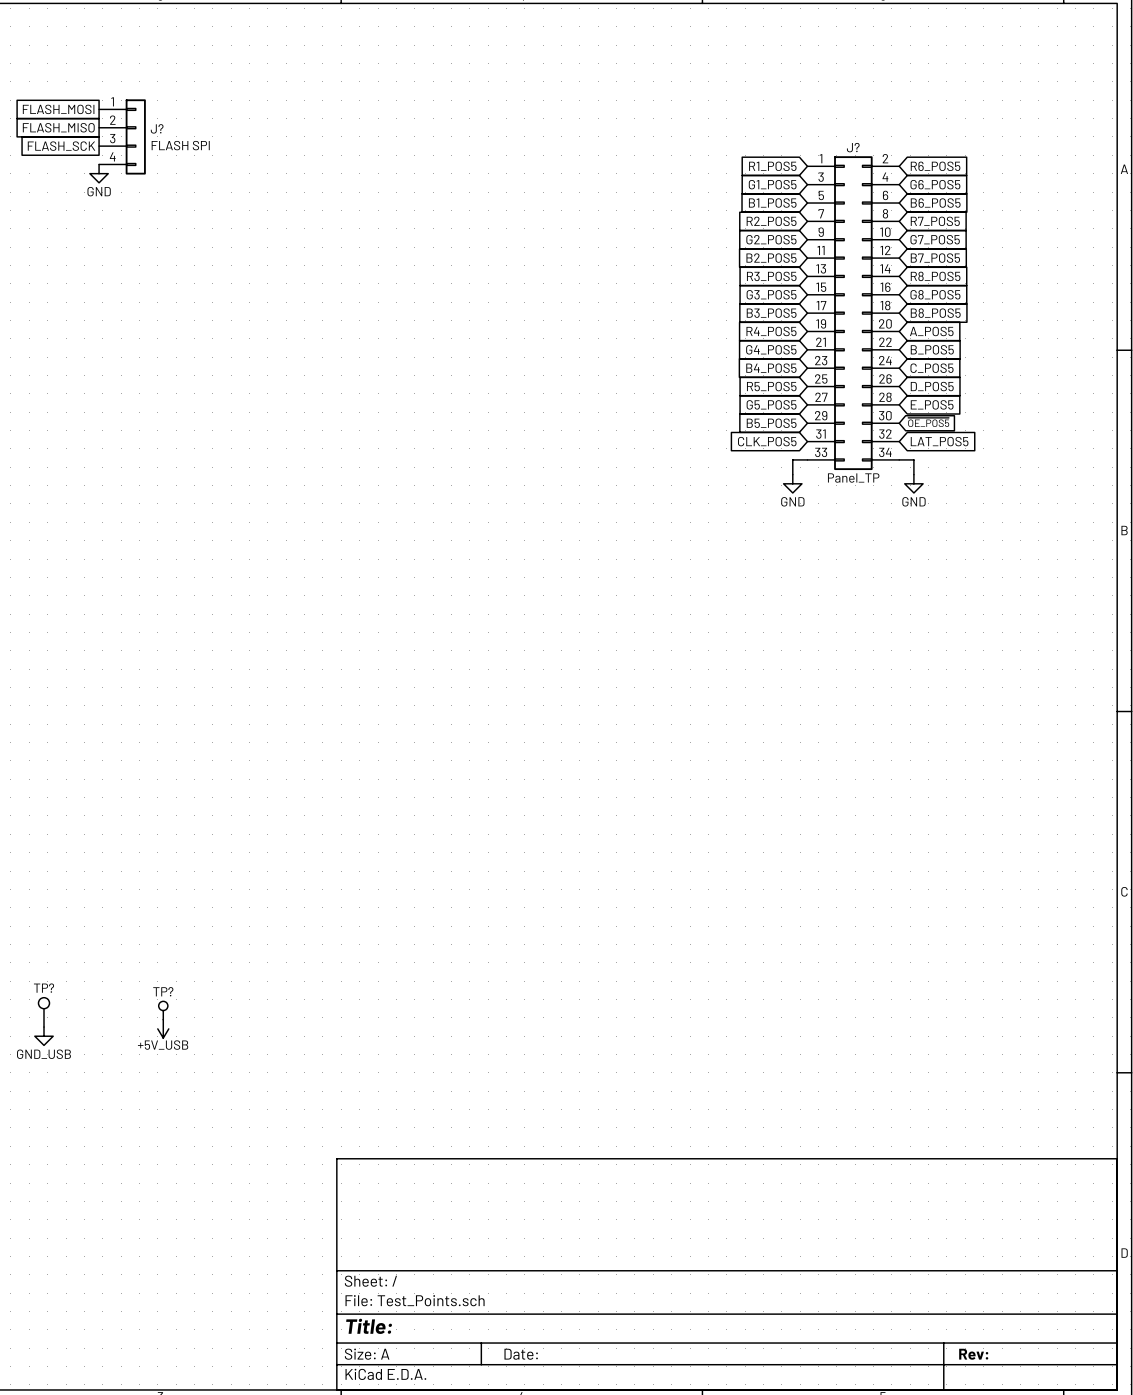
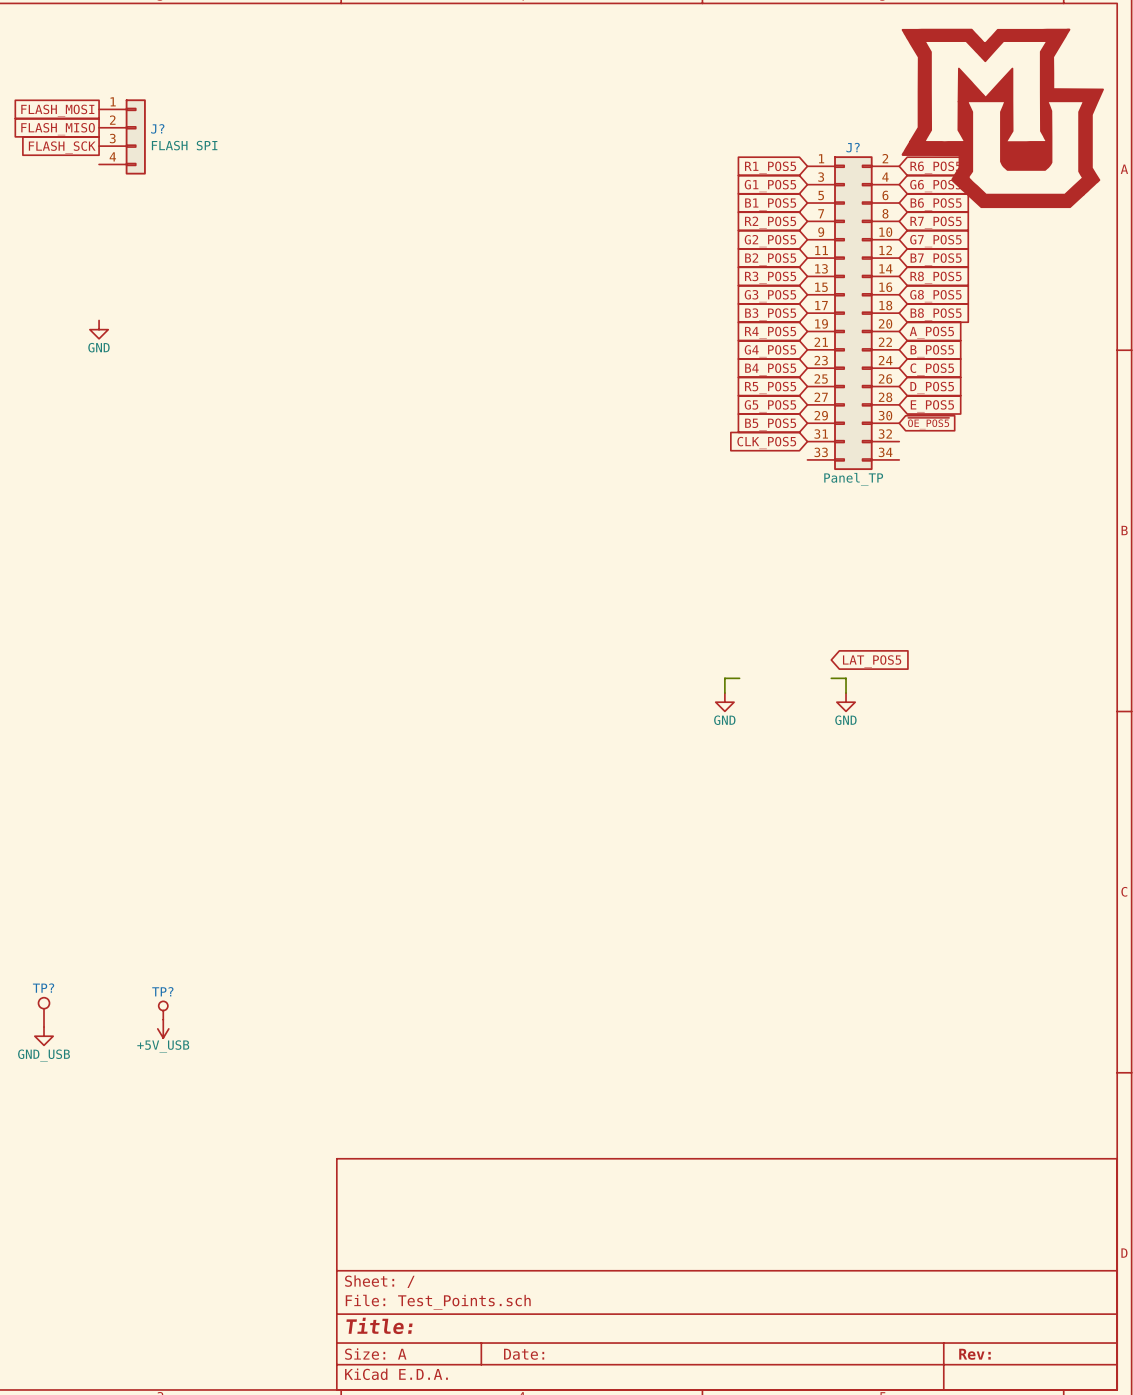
drawing: none -> [902, 29, 1104, 208]
power symbol position: GND (99, 173) -> GND (99, 329)
global label: LAT_POS5 (939, 441) -> none
wire: (807, 459) (792, 459) (792, 474) -> none
wire: (899, 459) (913, 459) (913, 474) -> none
power symbol: GND (792, 483) -> none
power symbol: GND (913, 483) -> none
global label: none -> LAT_POS5 (872, 661)
wire: none -> (739, 678) (724, 678) (724, 693)
wire: none -> (831, 678) (846, 678) (846, 693)
power symbol: none -> GND (724, 702)
power symbol: none -> GND (846, 702)

